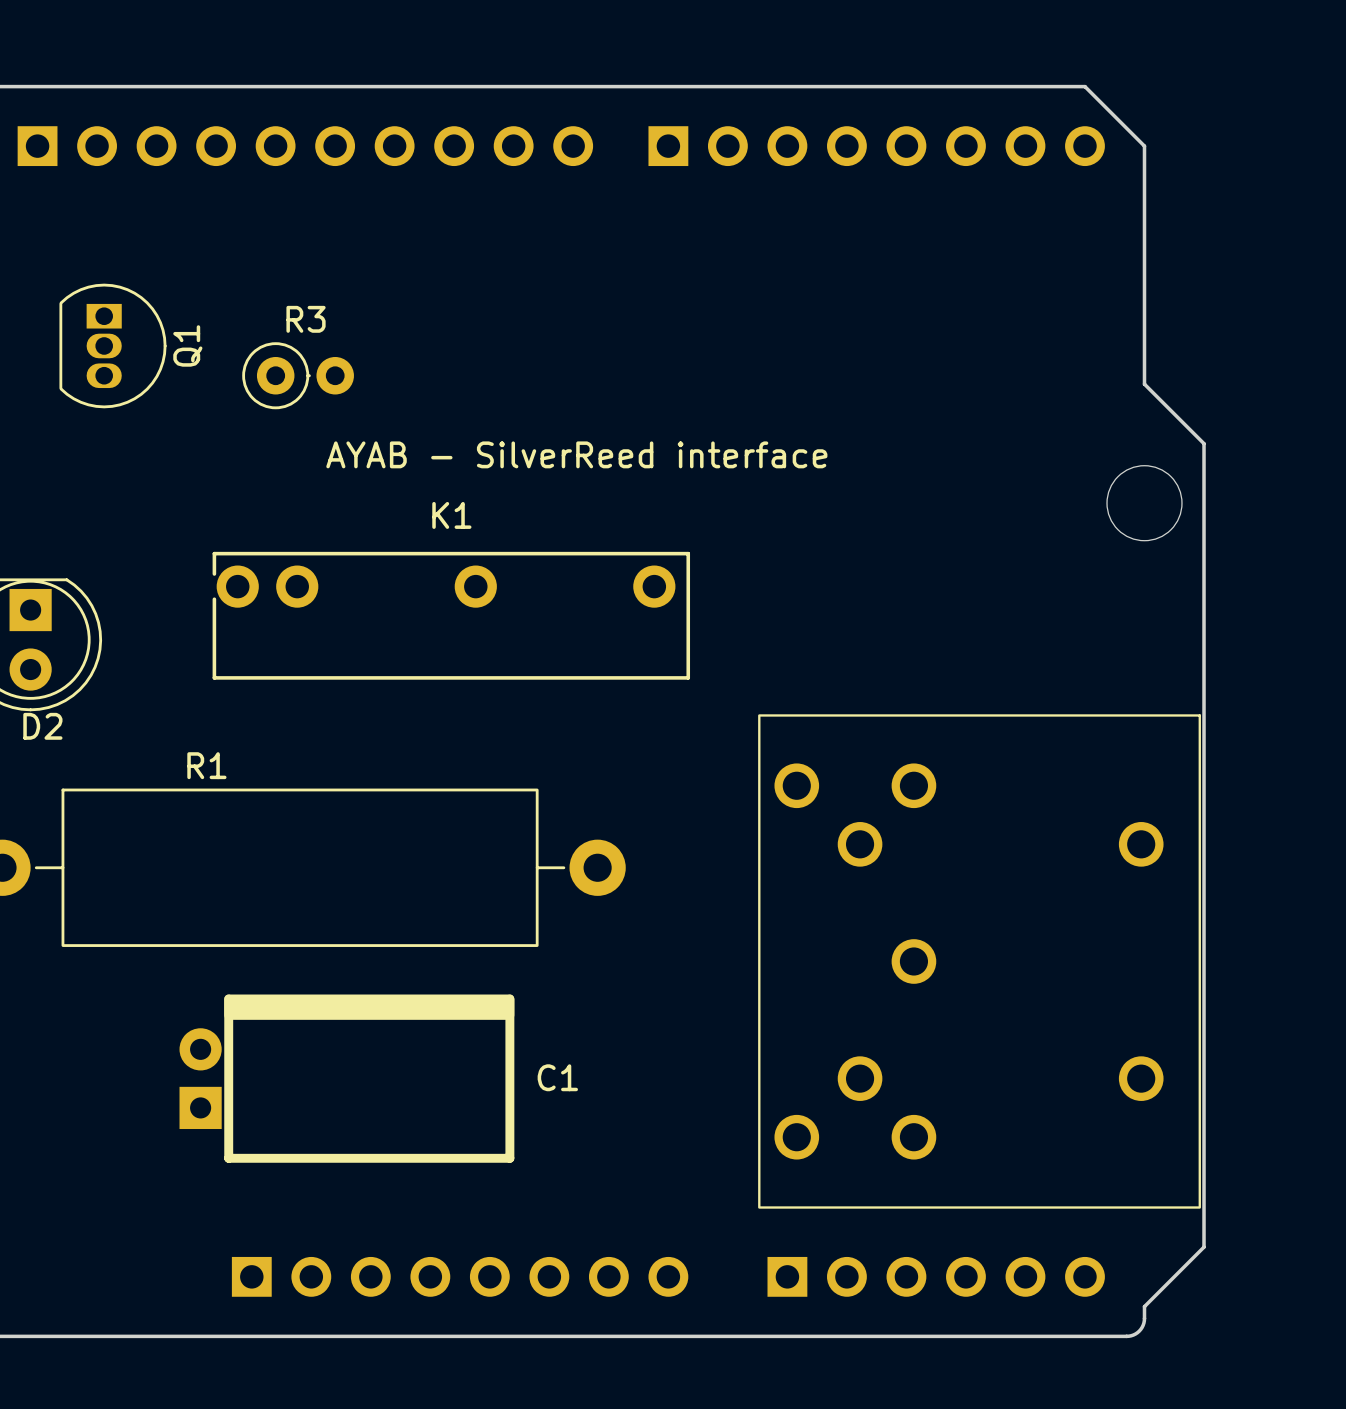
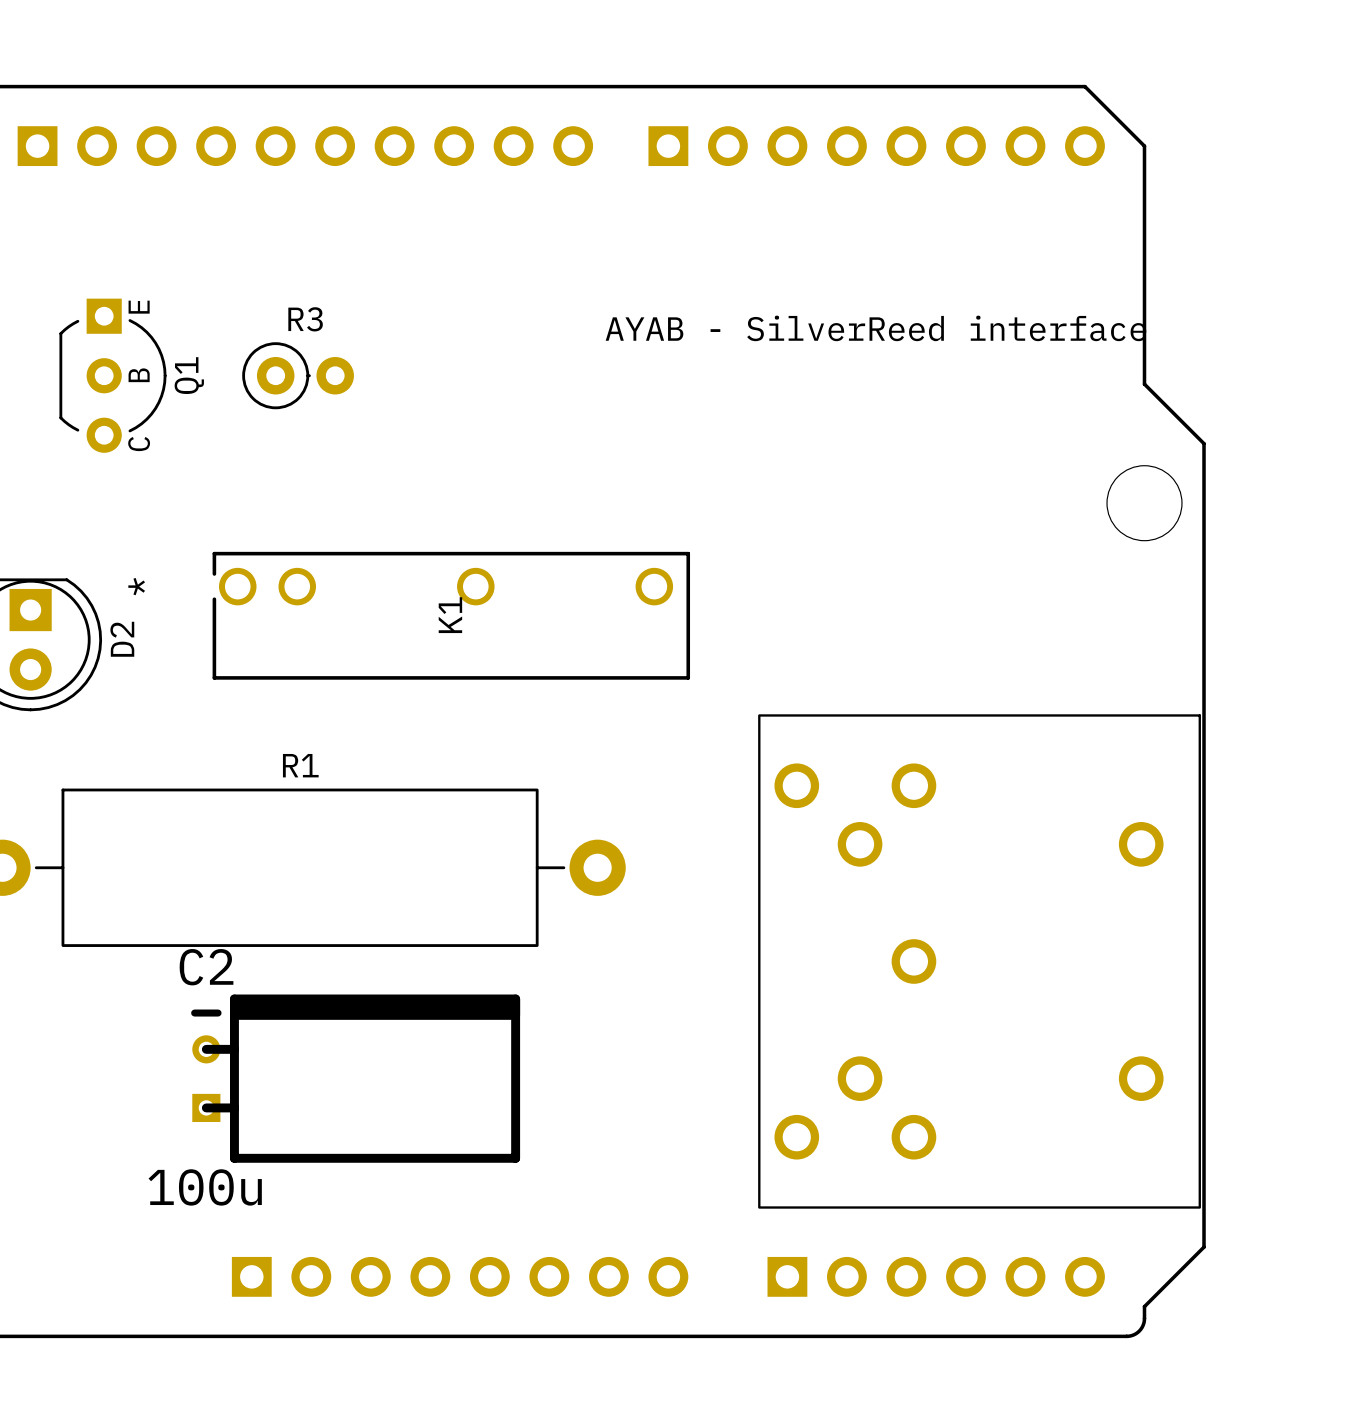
Q1 footprint: [59, 283, 167, 409] -> [59, 298, 167, 453]
text position: AYAB - SilverReed interface (576, 454) -> AYAB - SilverReed interface (875, 328)
K1 name position: K1 (451, 515) -> K1 (450, 615)
K1 footprint: [212, 551, 691, 680] -> [212, 551, 691, 680]
D2 name rotation: 0° (42, 726) -> 90° counterclockwise (122, 639)
D2 name position: D2 (42, 726) -> D2 (122, 639)
R1 name position: R1 (206, 765) -> R1 (300, 765)
C1: (346, 1078) -> none
C2: none -> 100u (355, 1078)

